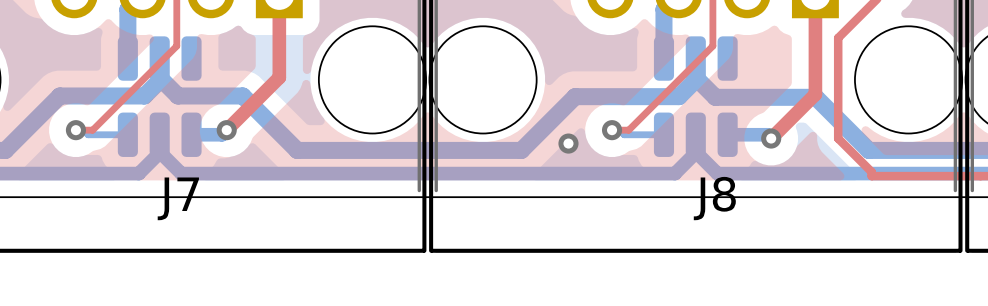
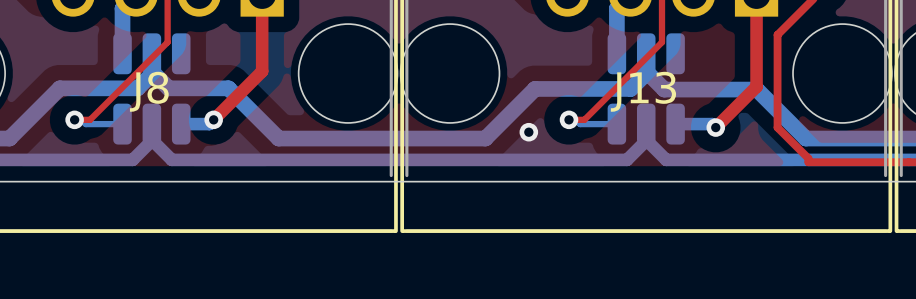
J7 name: J7 (178, 198) -> J8 (149, 91)
J8 name: J8 (714, 198) -> J13 (643, 91)

